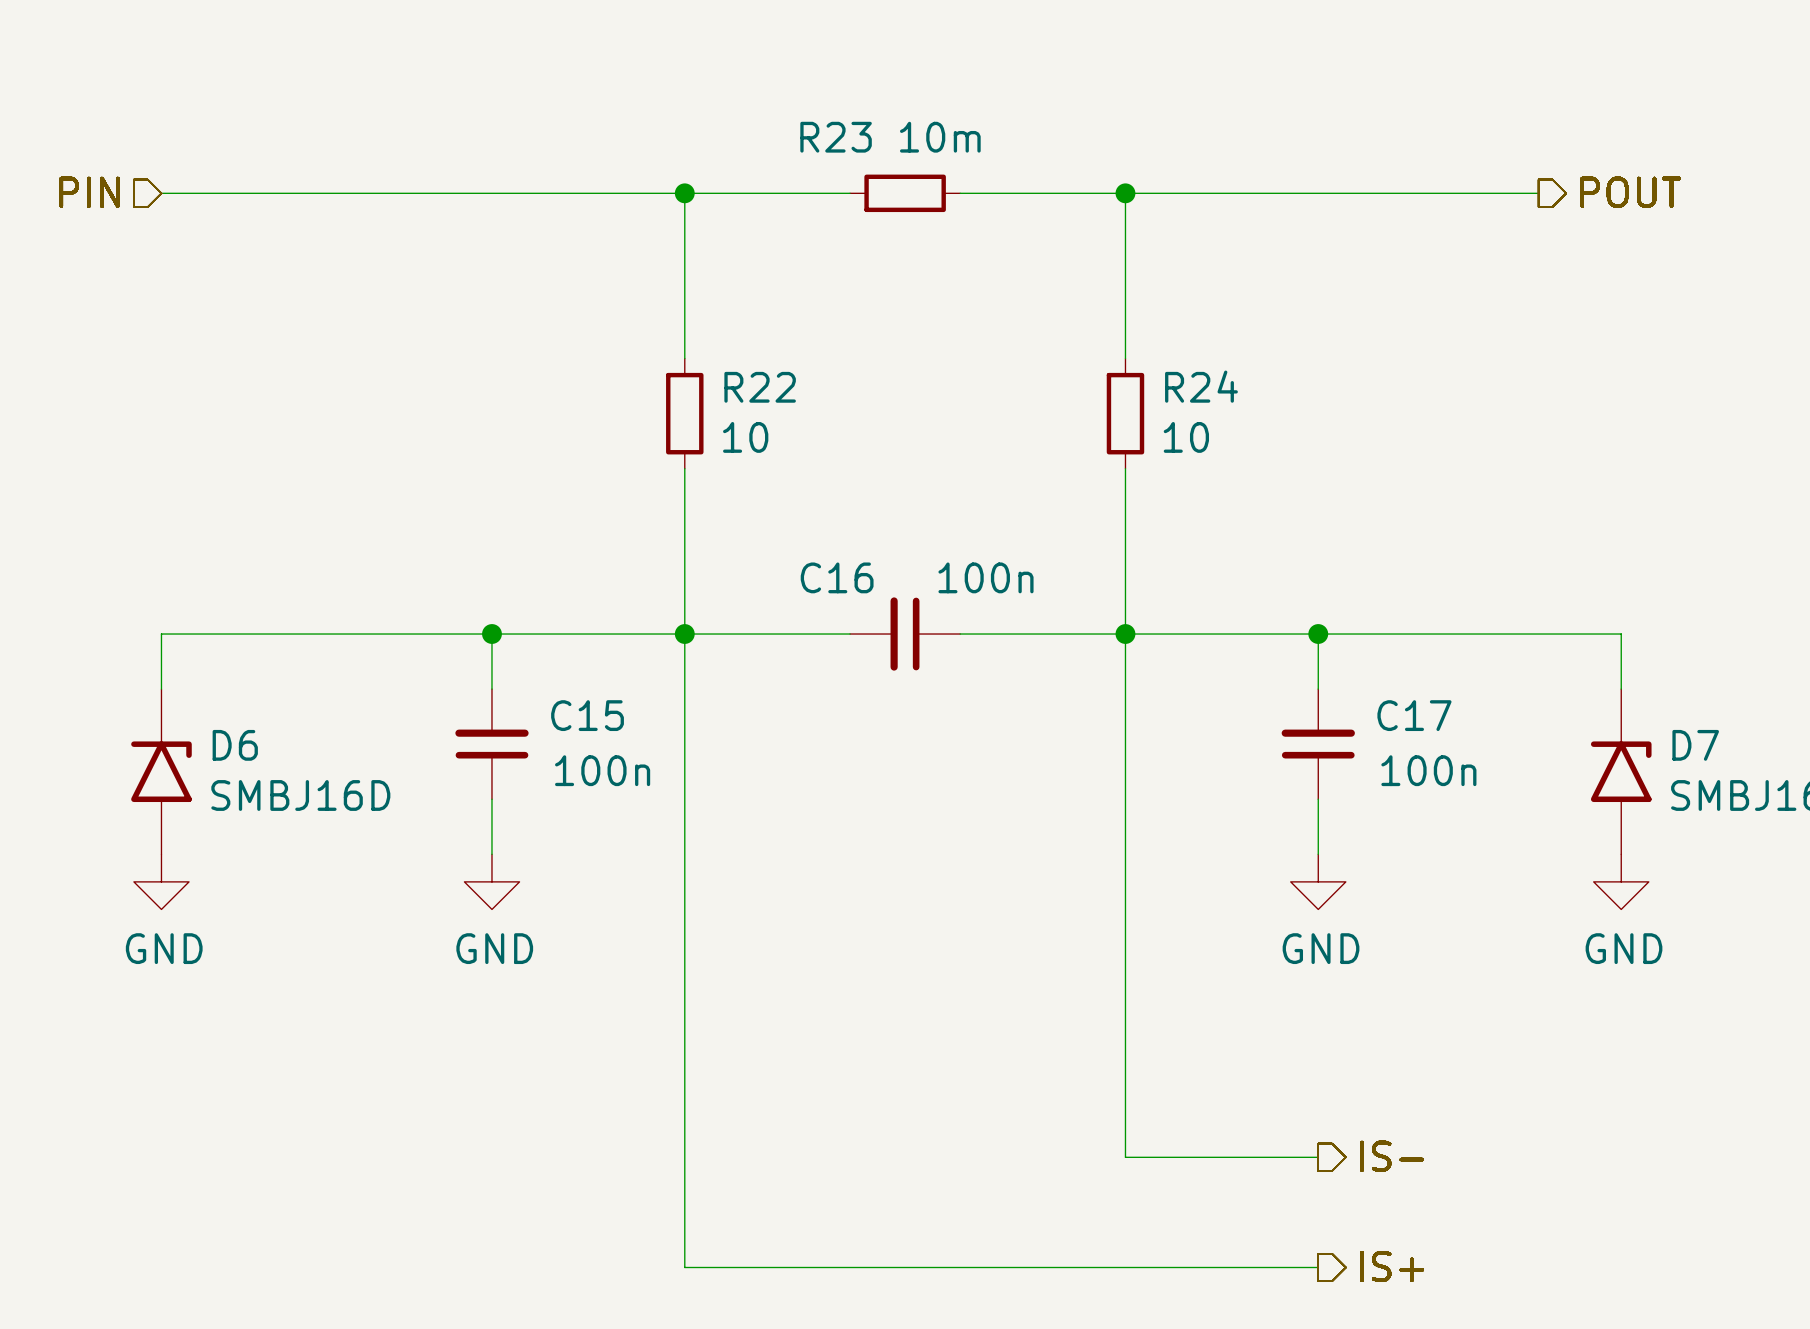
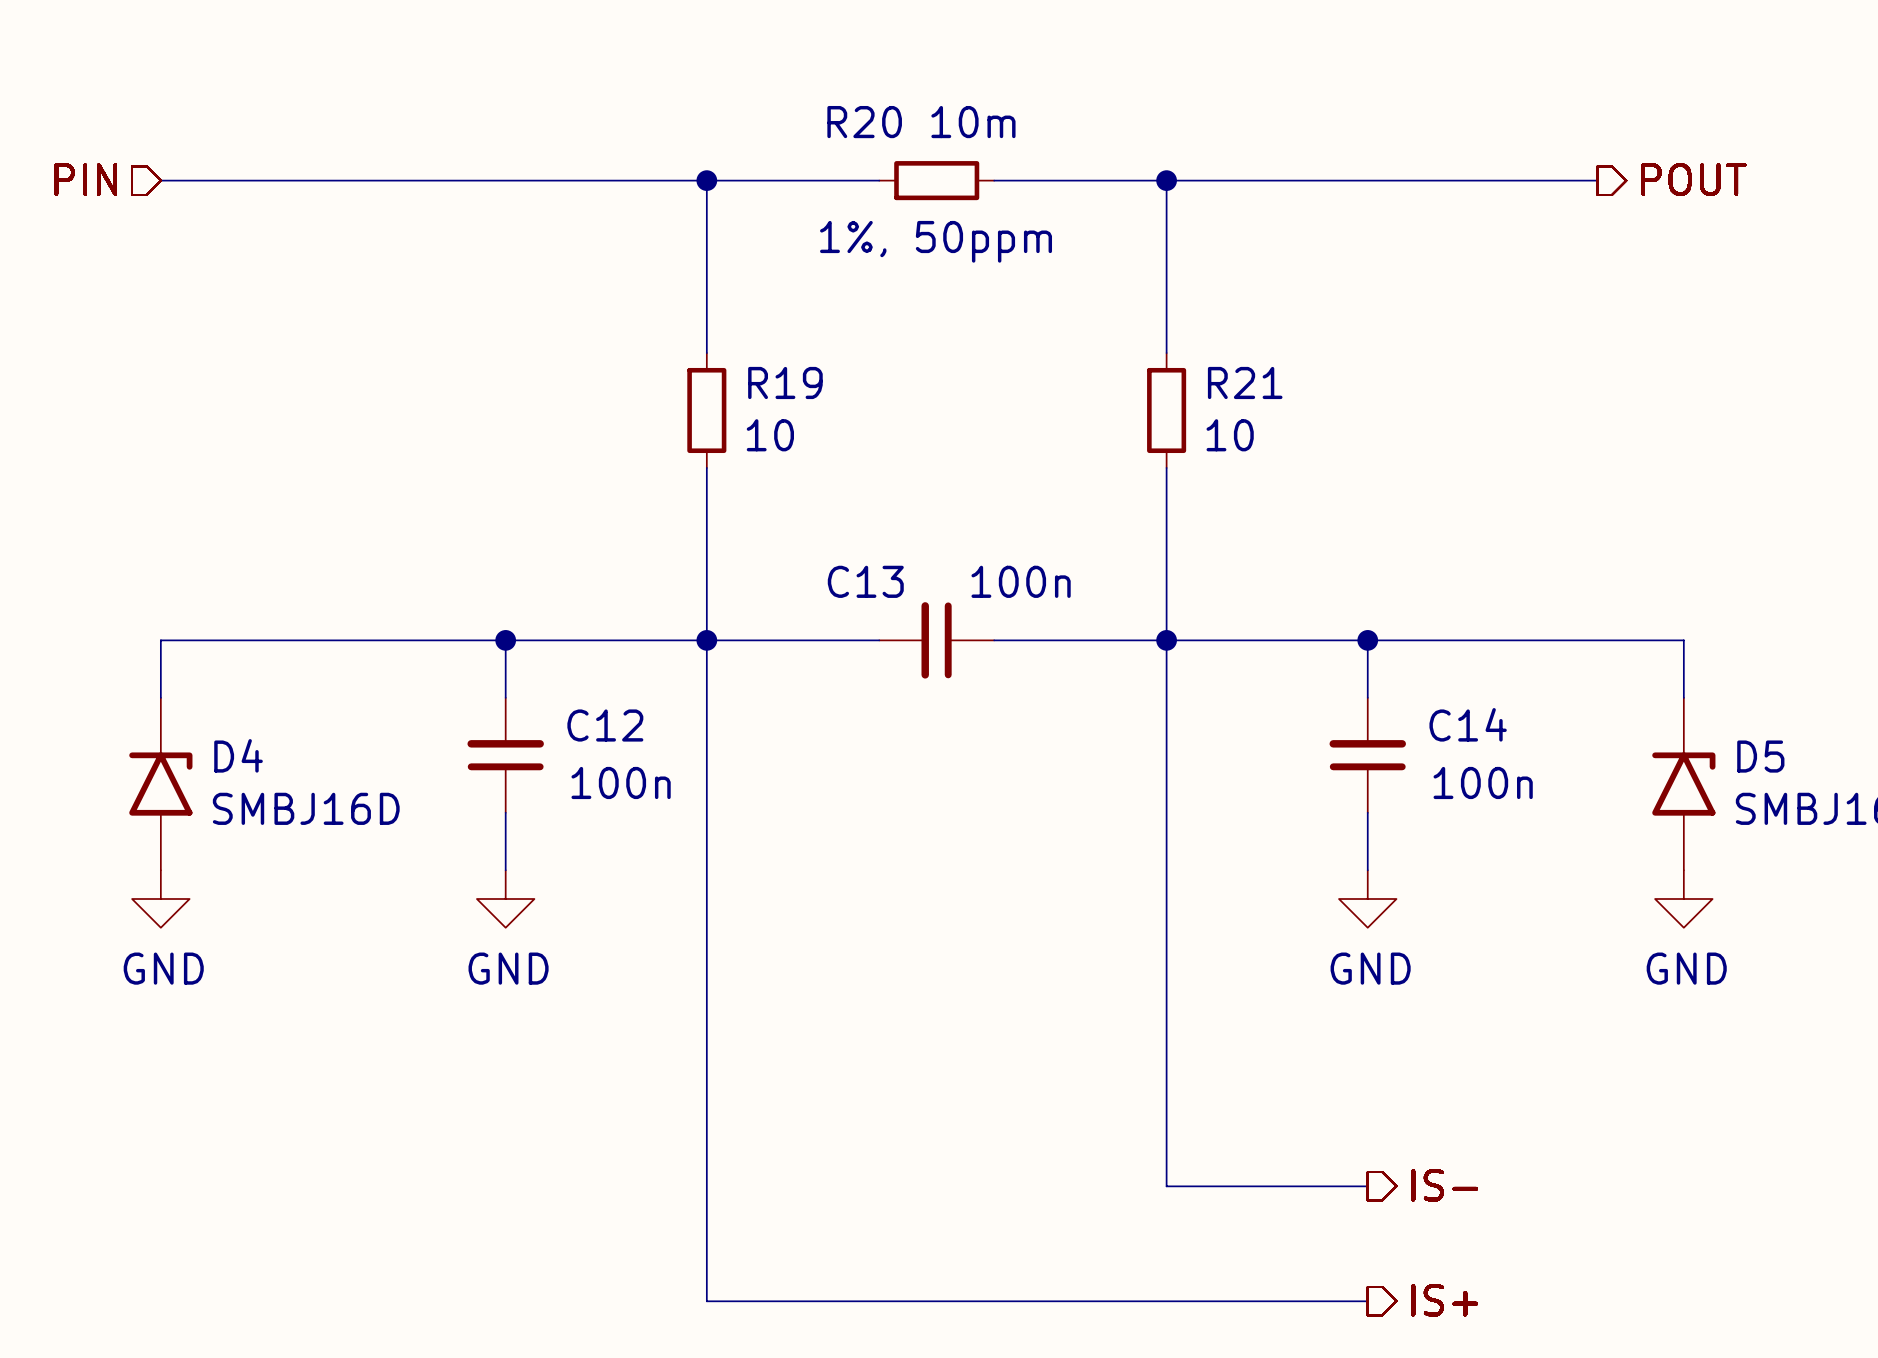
R23 name: R23 (836, 137) -> R20 (864, 122)
R23 text: none -> 1%, 50ppm (936, 241)
R24 name: R24 (1201, 386) -> R21 (1245, 382)
R22 name: R22 (760, 387) -> R19 (785, 382)
C16 name: C16 (837, 577) -> C13 (865, 581)
C15 name: C15 (587, 715) -> C12 (605, 725)
C17 name: C17 (1414, 715) -> C14 (1468, 724)
D6 name: D6 (235, 745) -> D4 (238, 755)
D7 name: D7 (1695, 745) -> D5 (1760, 756)

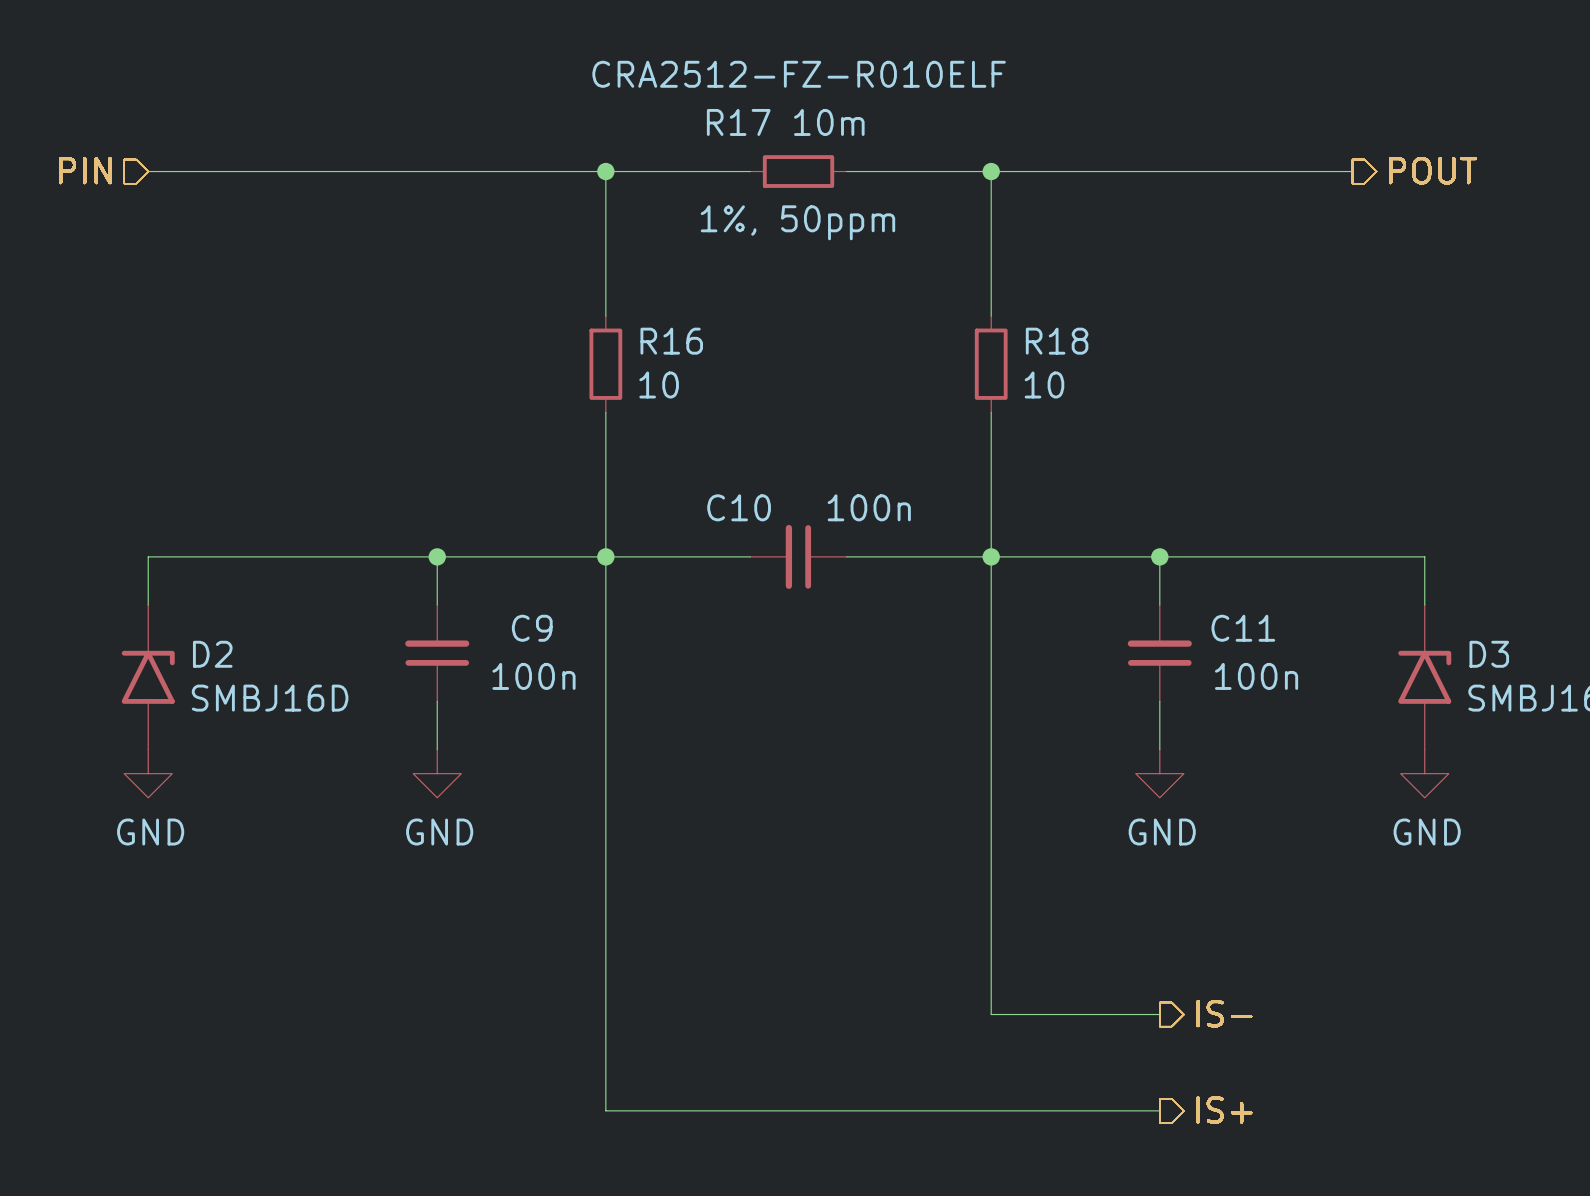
R20 text: none -> CRA2512-FZ-R010ELF (799, 74)
R20 name: R20 (864, 122) -> R17 (738, 122)
R19 name: R19 (785, 382) -> R16 (671, 341)
R21 name: R21 (1245, 382) -> R18 (1057, 341)
C13 name: C13 (865, 581) -> C10 (739, 507)
C14 name: C14 (1468, 724) -> C11 (1243, 628)
C12 name: C12 (605, 725) -> C9 (532, 628)
D4 name: D4 (238, 755) -> D2 (212, 654)
D5 name: D5 (1760, 756) -> D3 (1489, 654)

